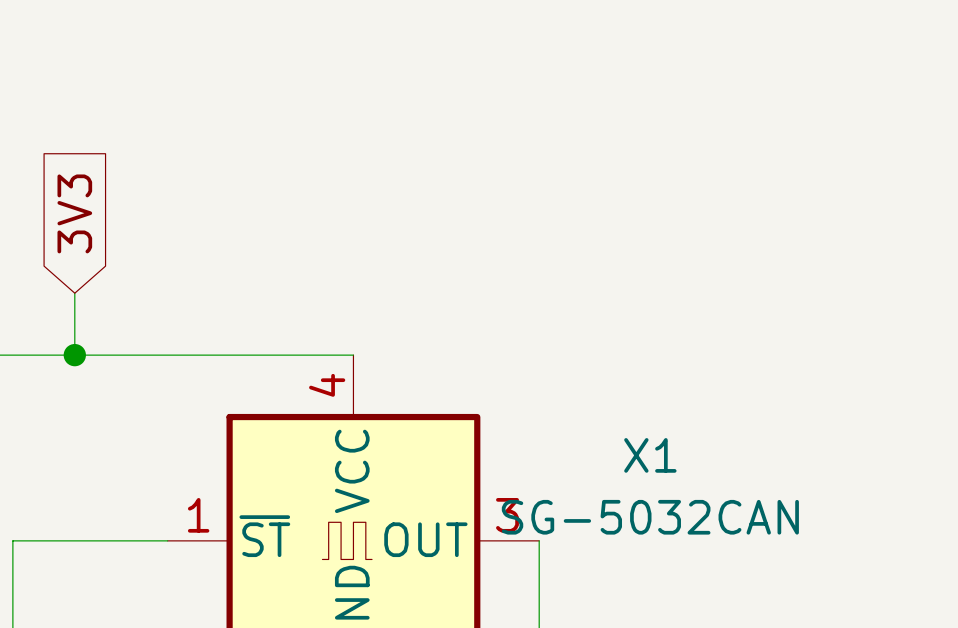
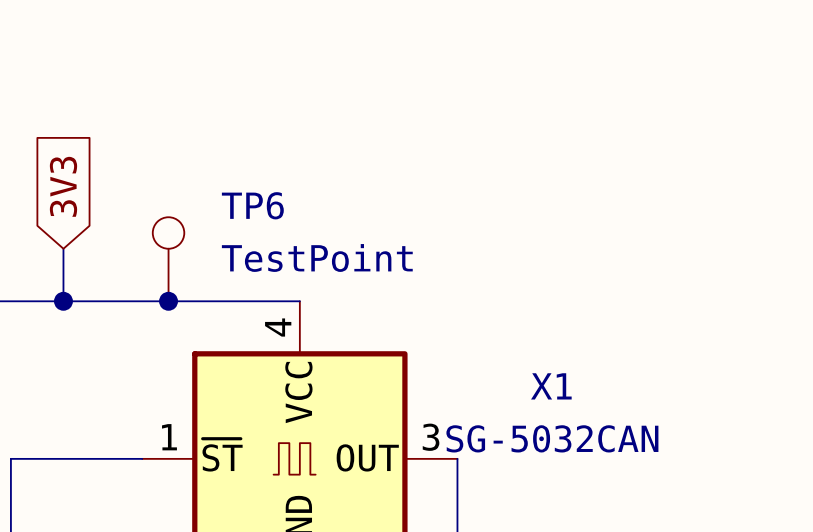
TP6: none -> TestPoint (168, 259)
junction: none -> (168, 301)

